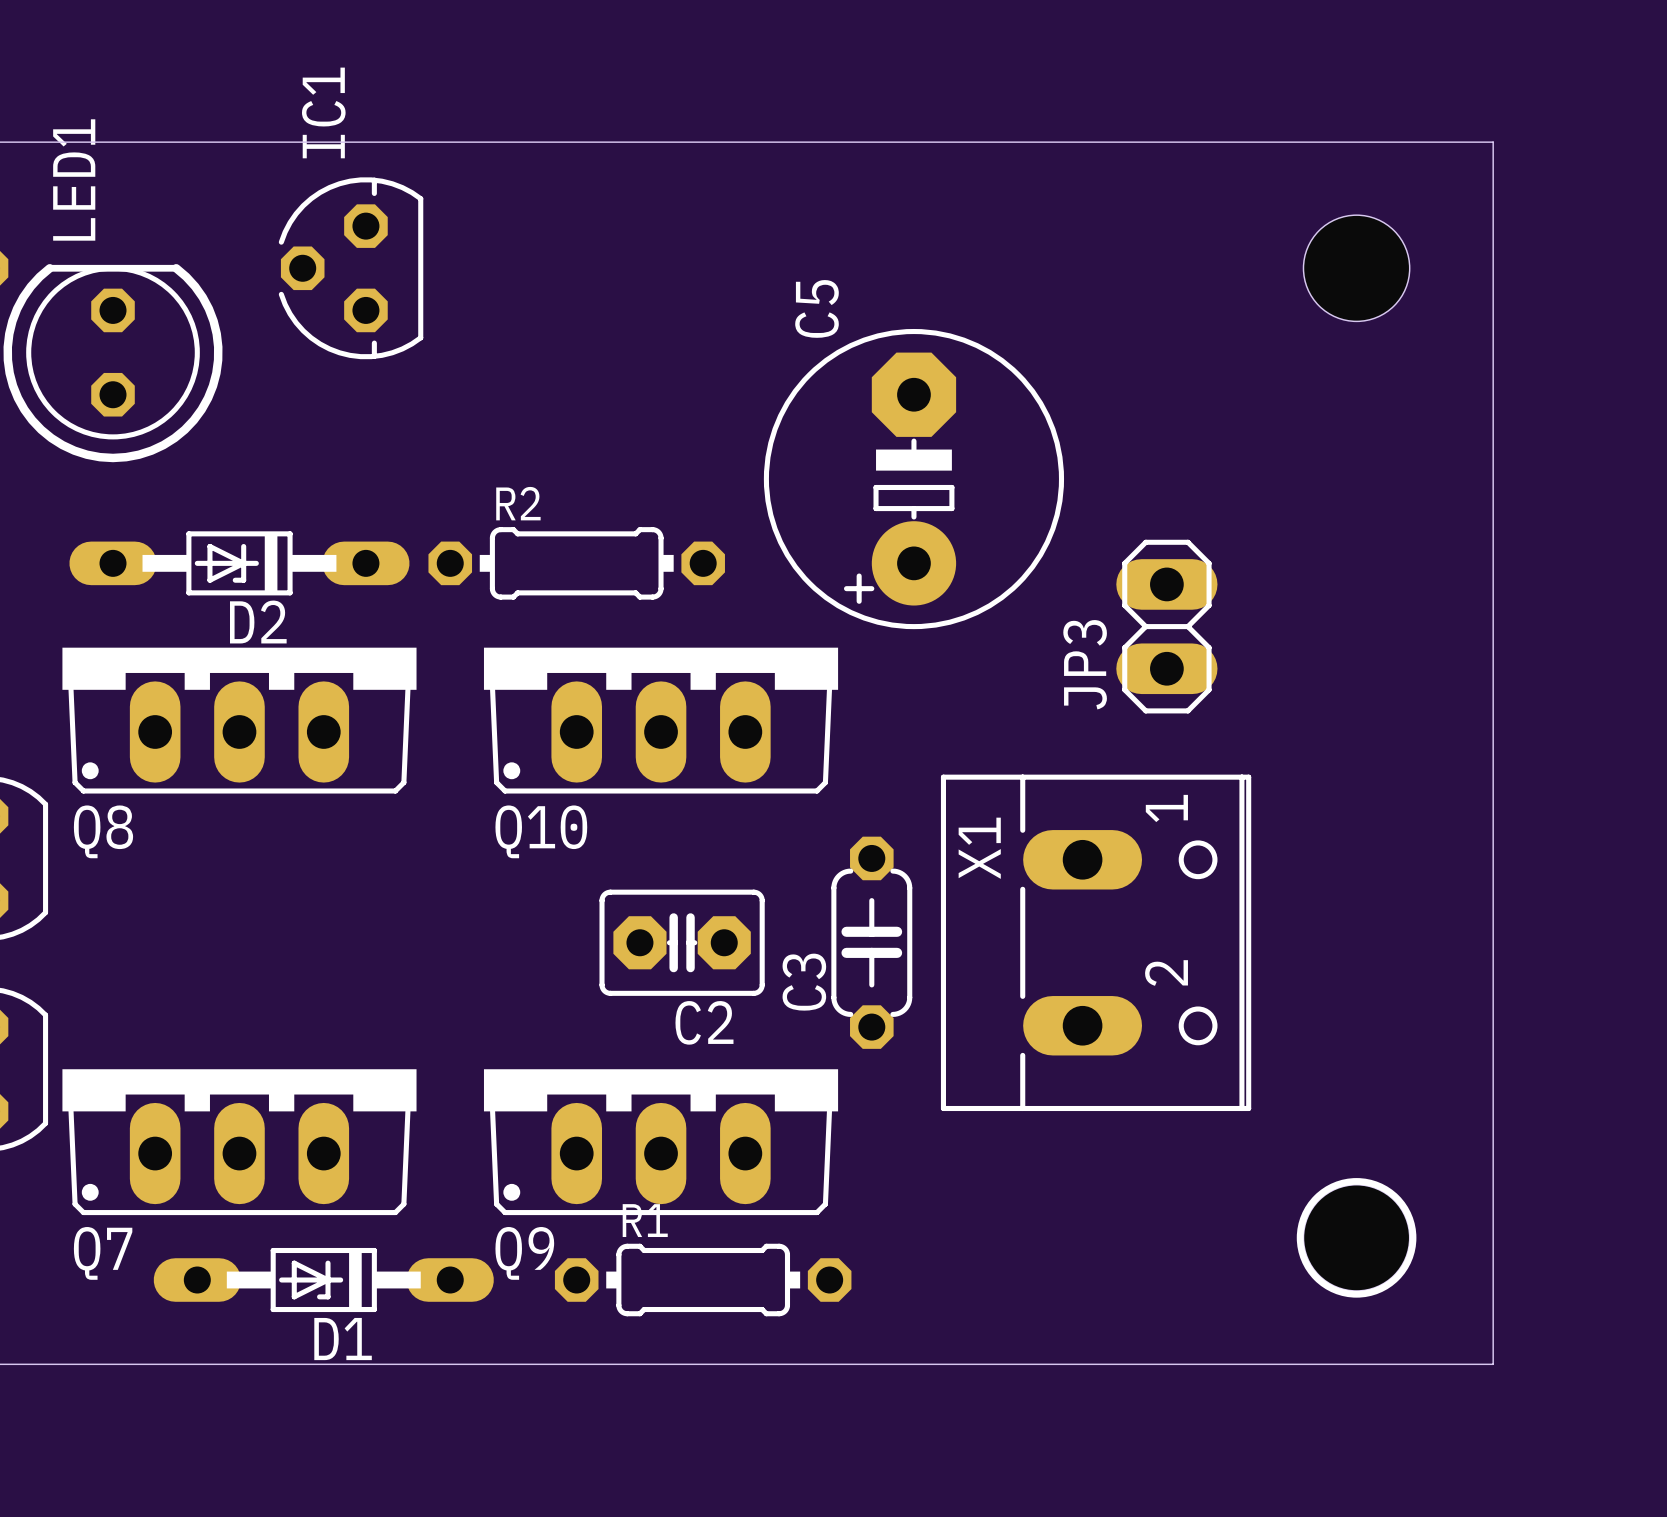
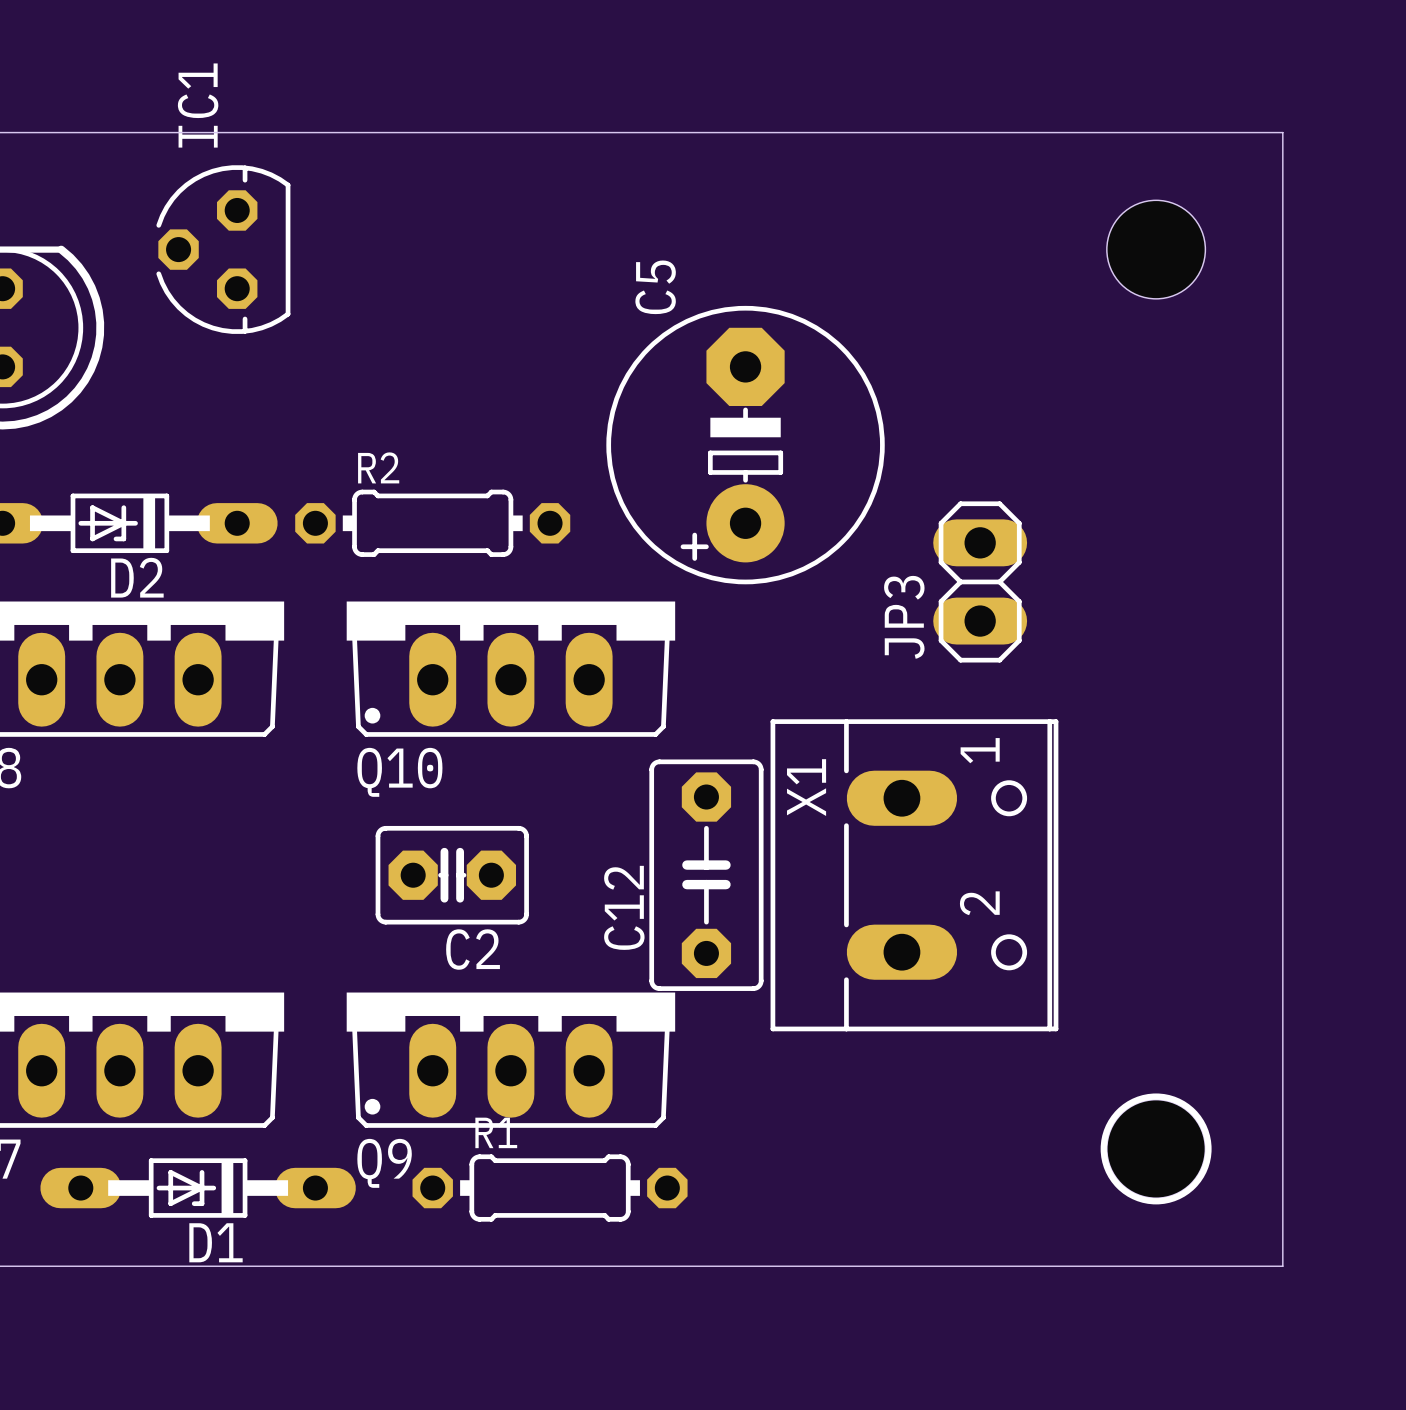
C2 position: (682, 942) -> (452, 875)
C3: (871, 942) -> none
C12: none -> (706, 875)

